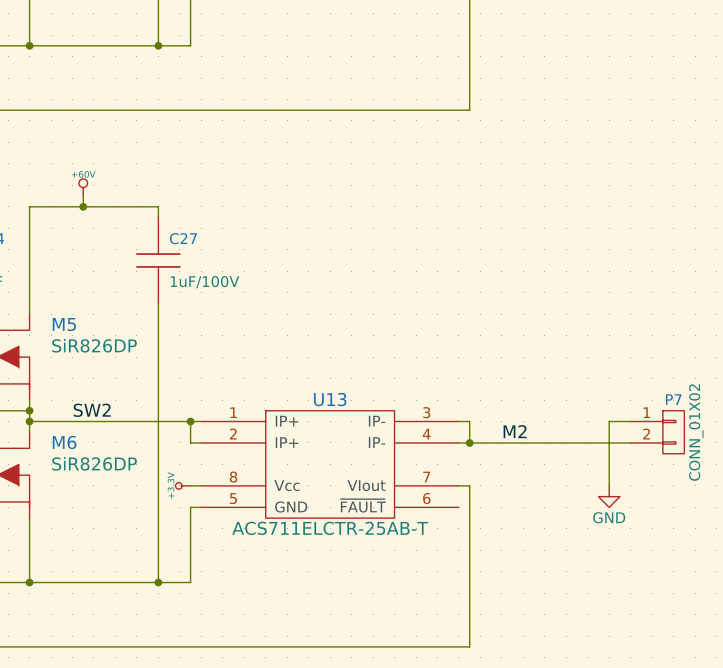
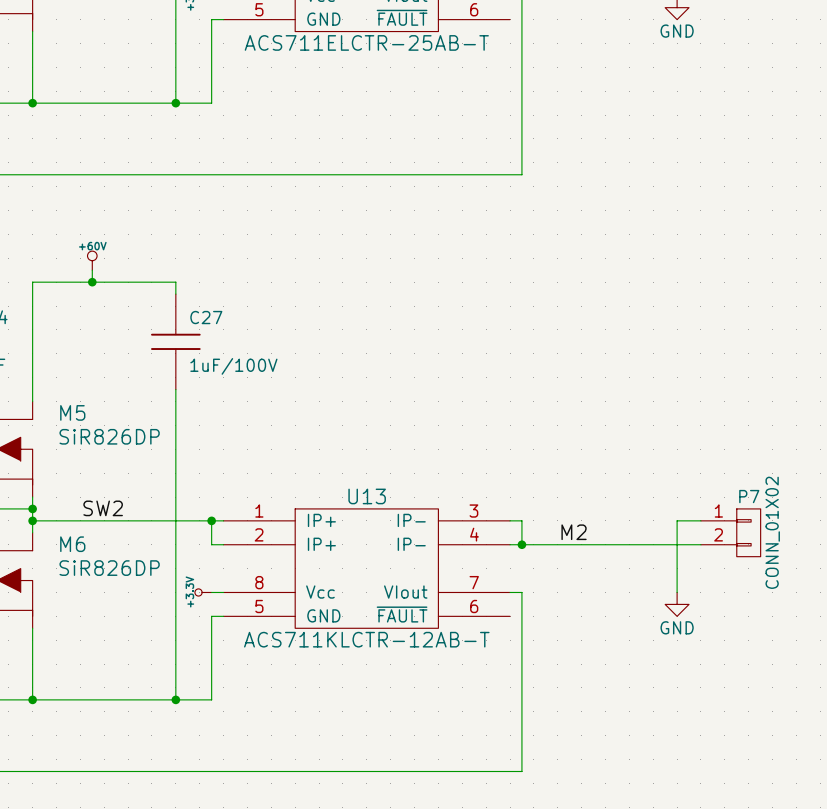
U13 value: ACS711ELCTR-25AB-T (330, 528) -> ACS711KLCTR-12AB-T (366, 639)

